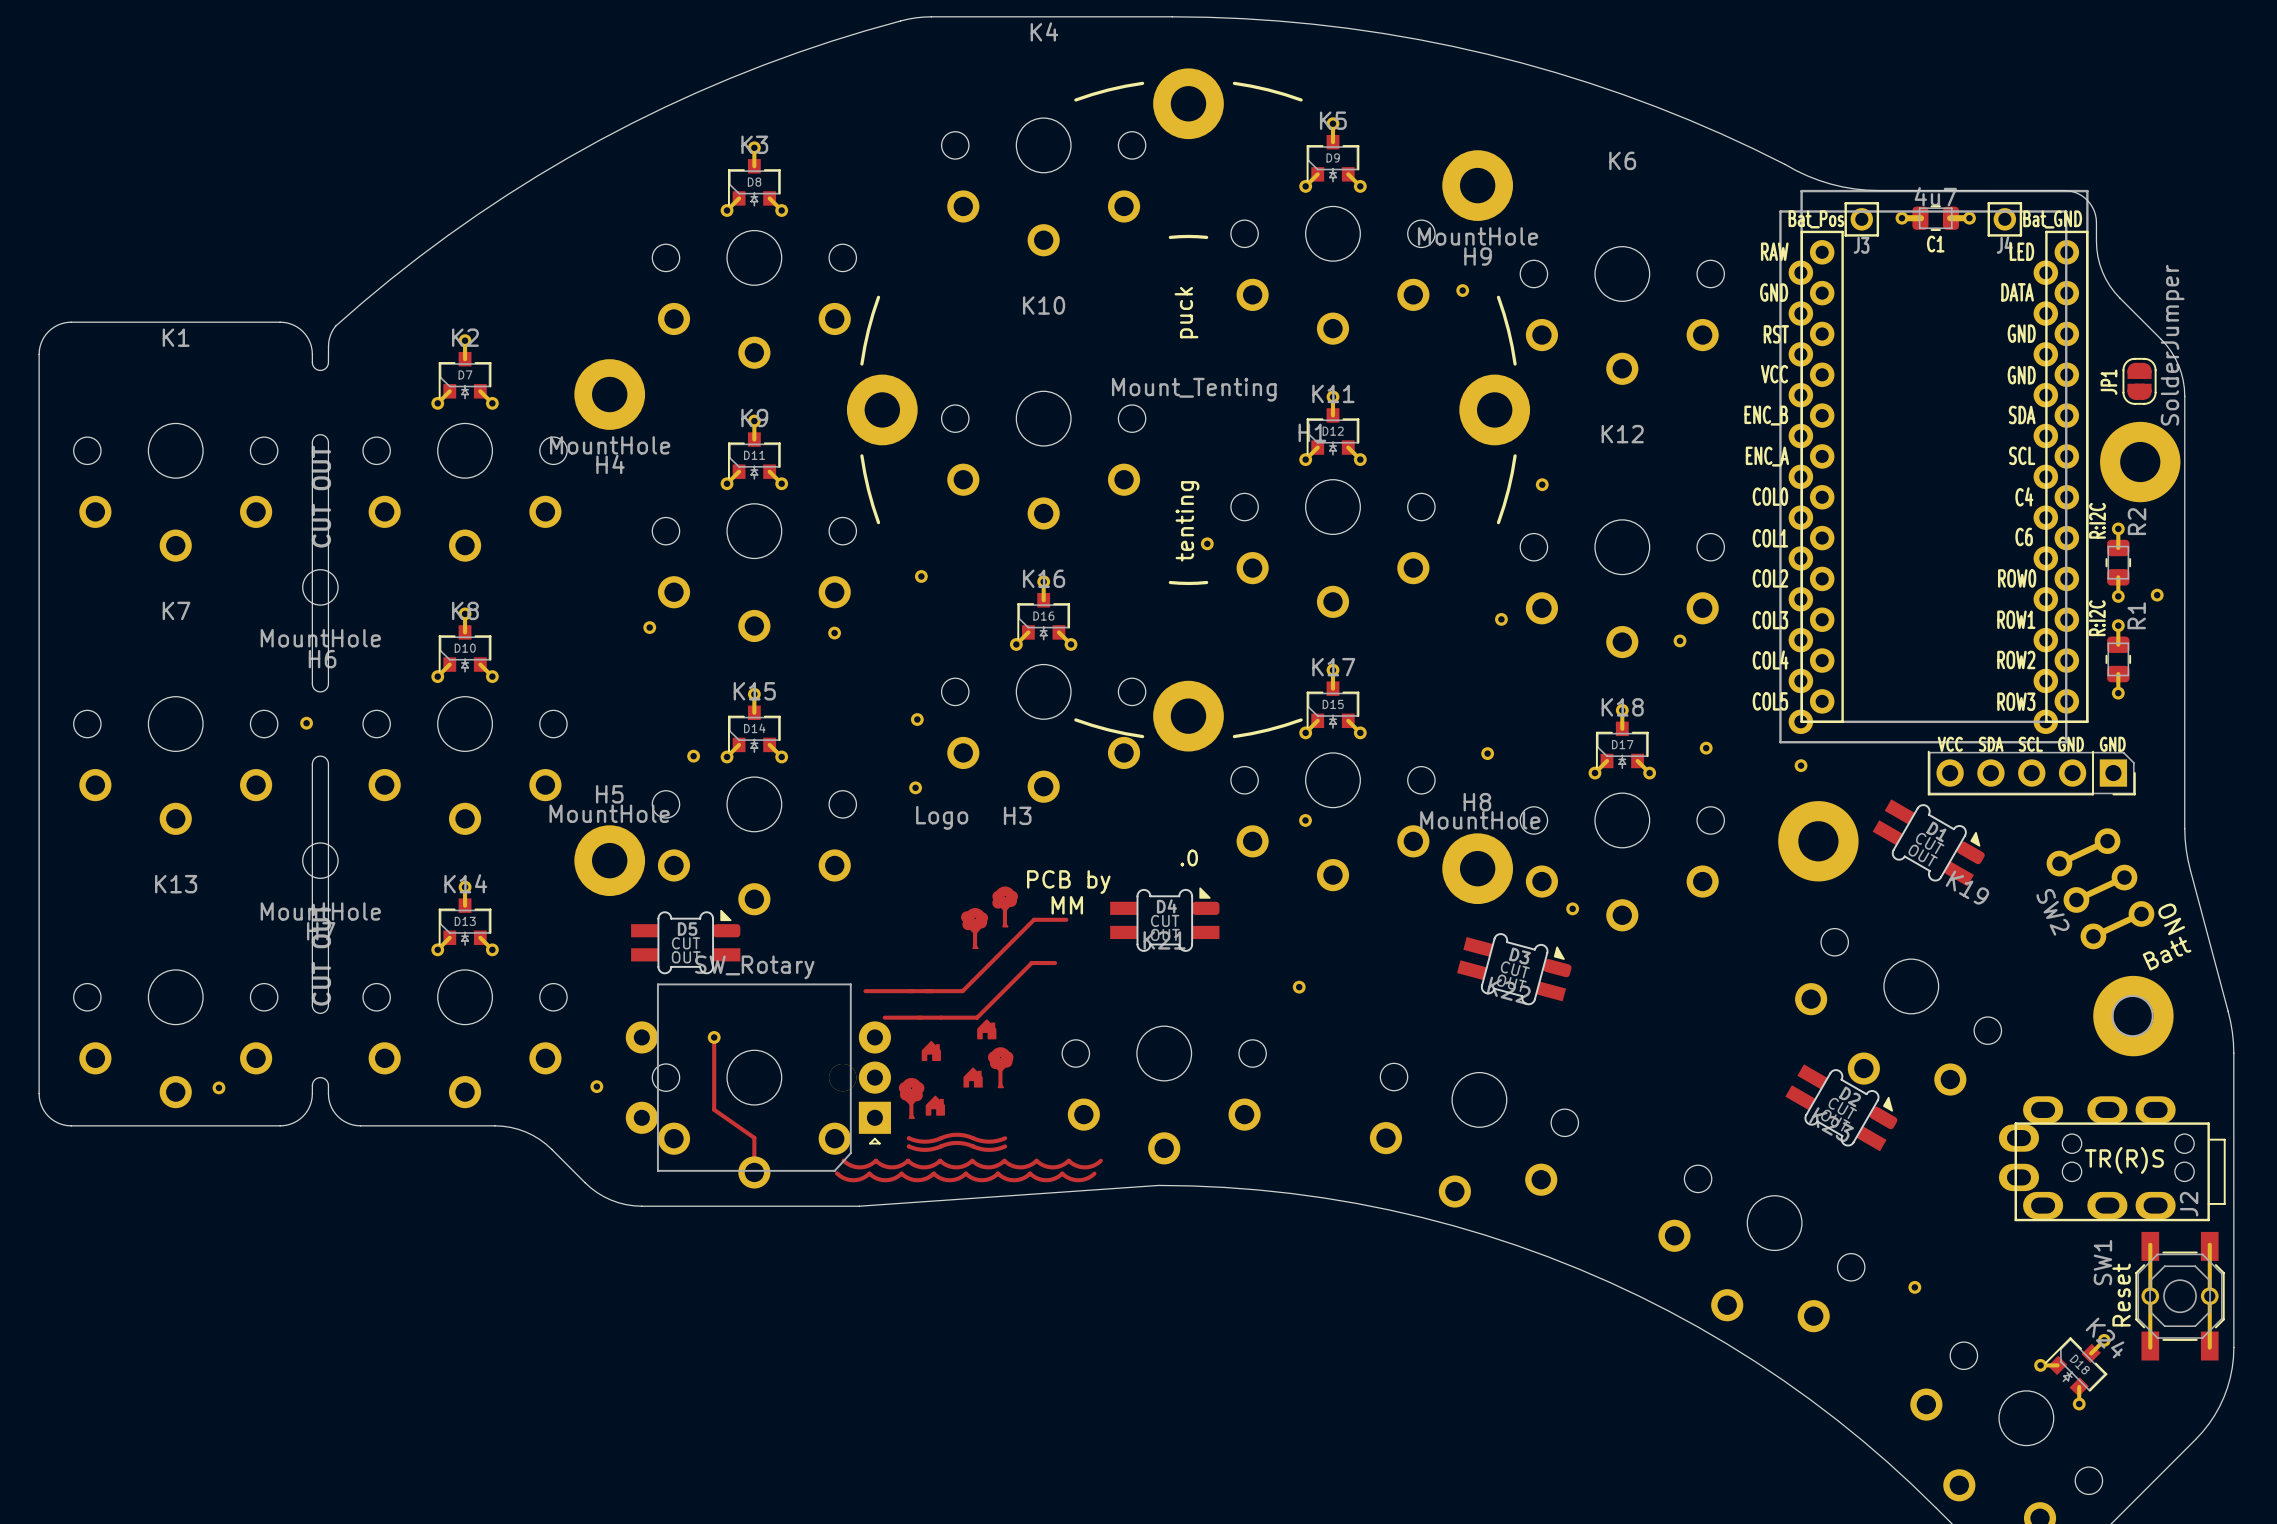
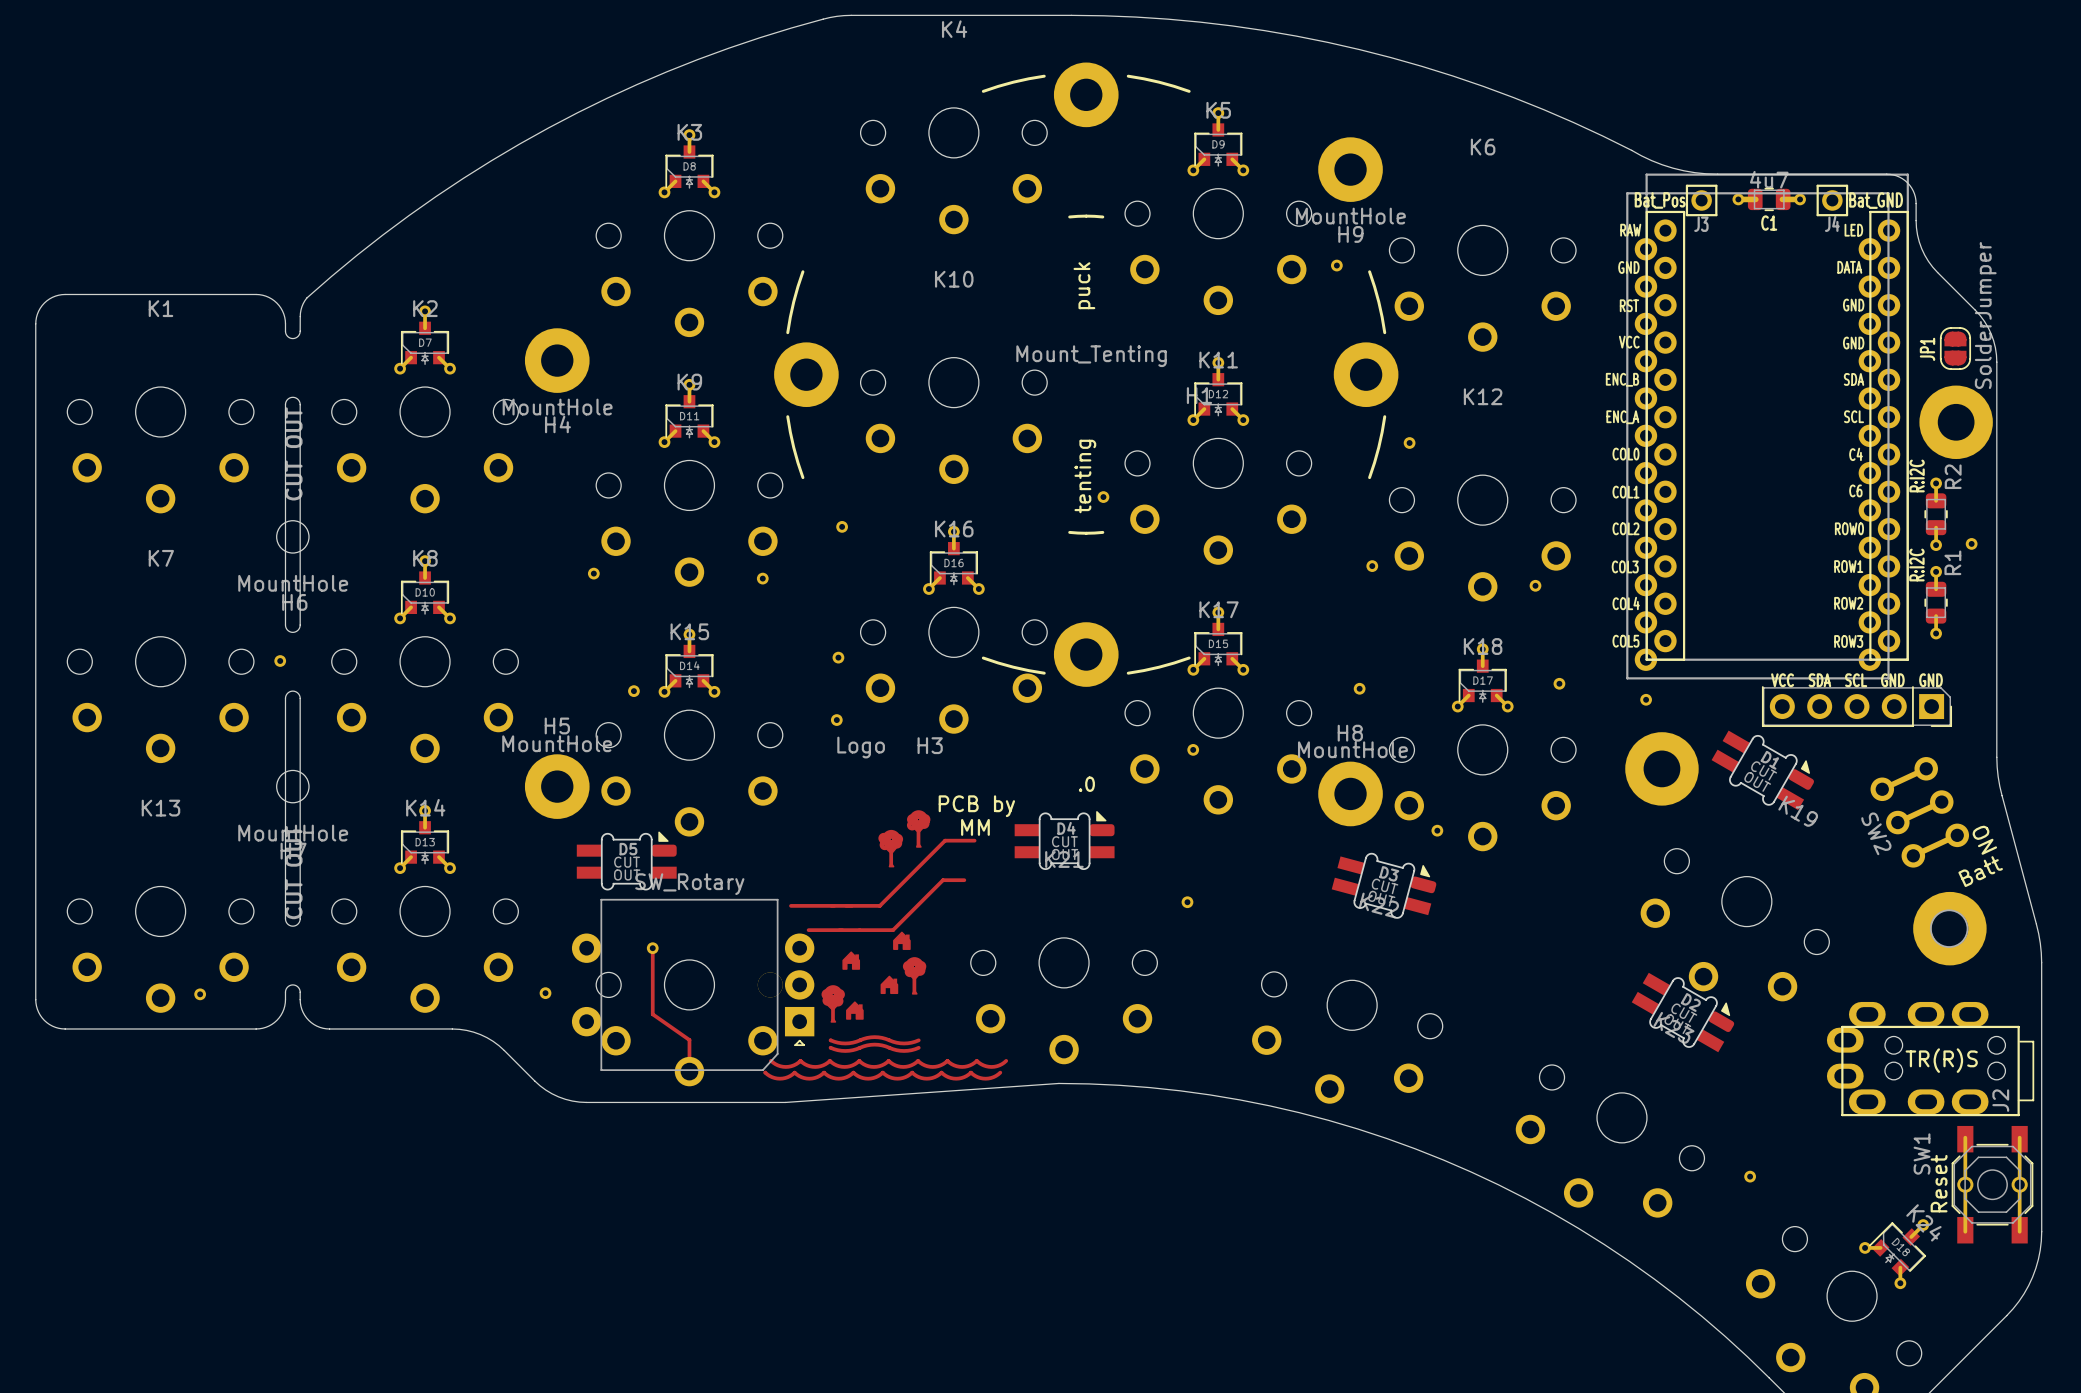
part footprint: [1779, 189, 2089, 744] -> [1626, 173, 1909, 680]

